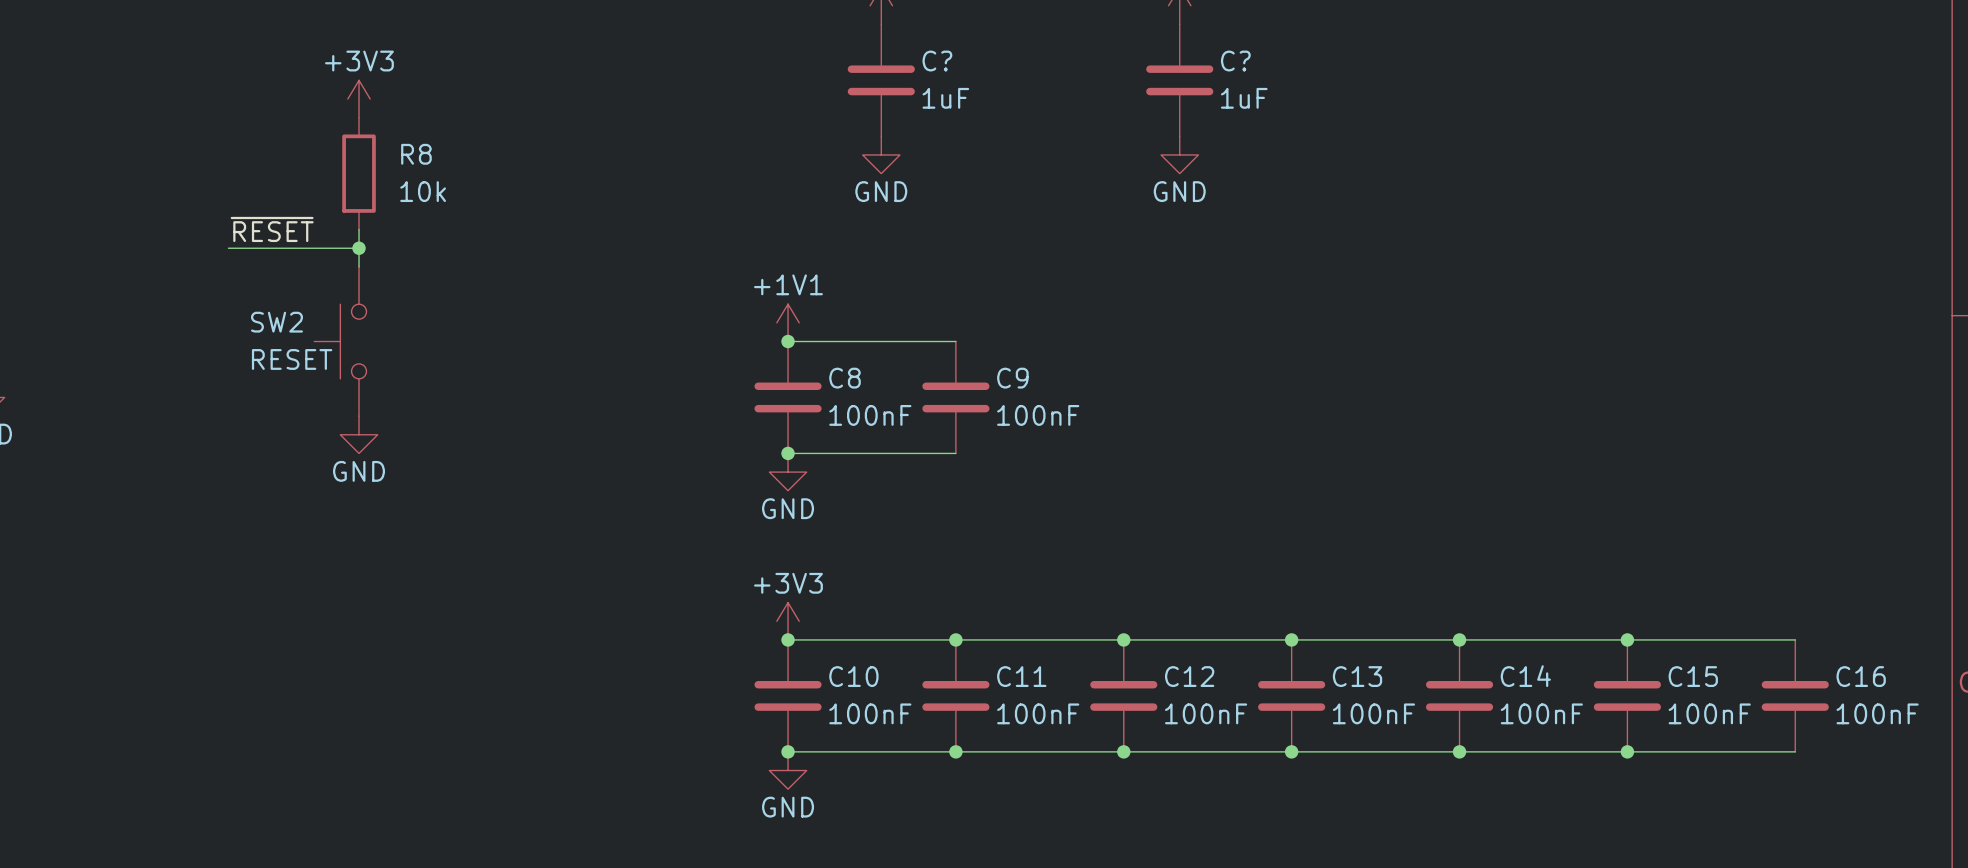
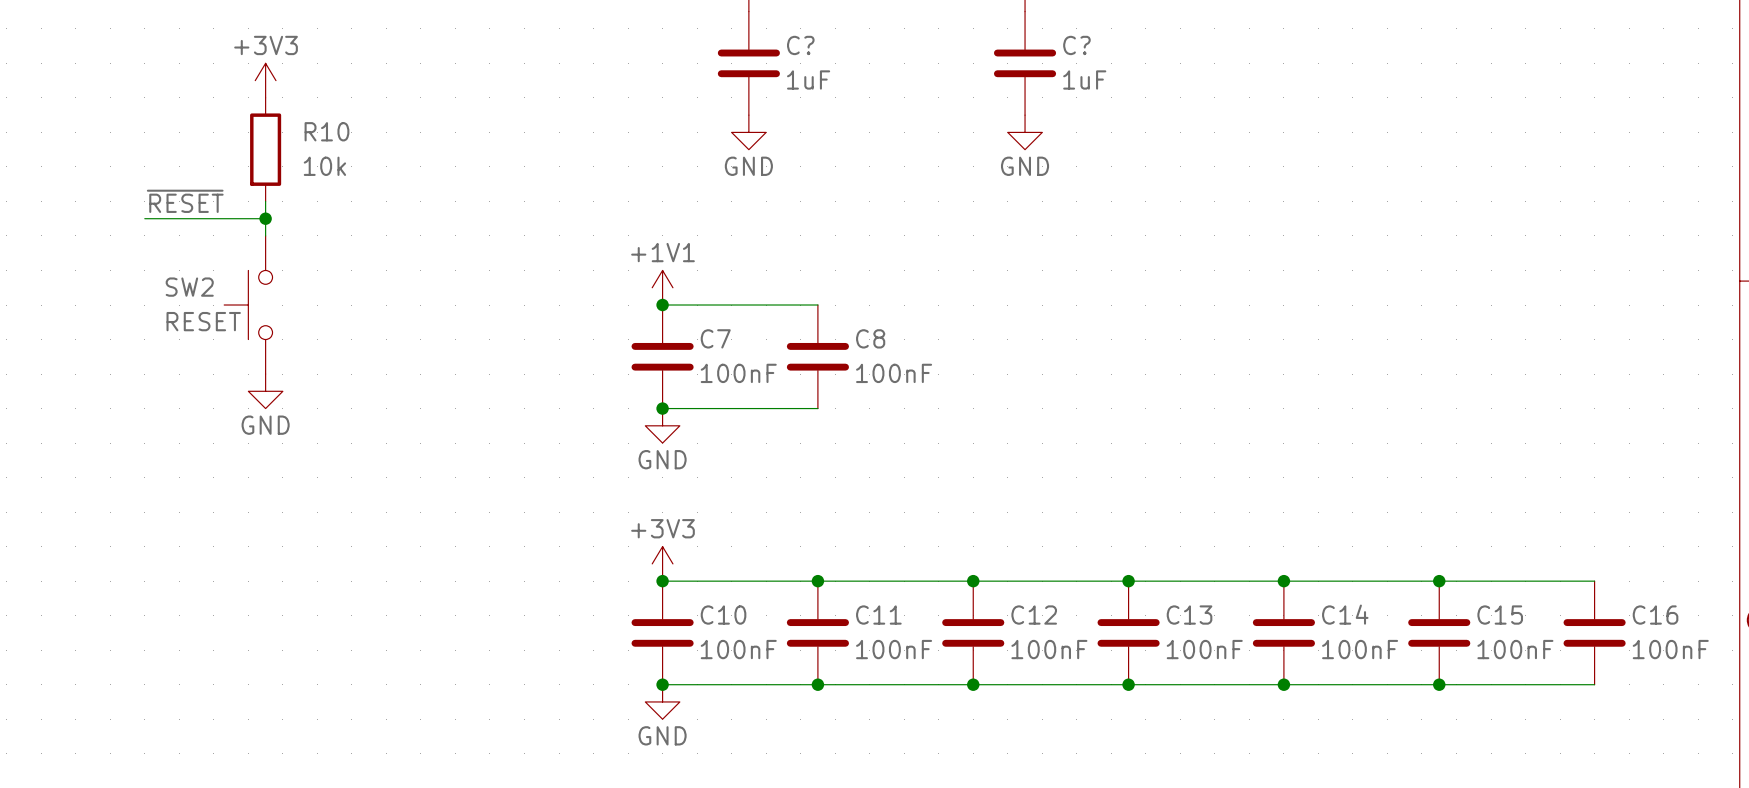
R8 name: R8 (416, 154) -> R10 (326, 131)
C8 name: C8 (845, 378) -> C7 (715, 338)
C9 name: C9 (1012, 378) -> C8 (870, 338)

